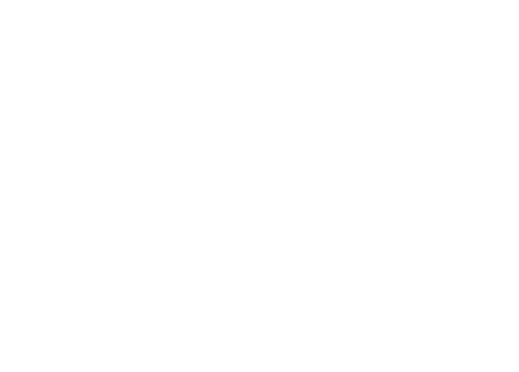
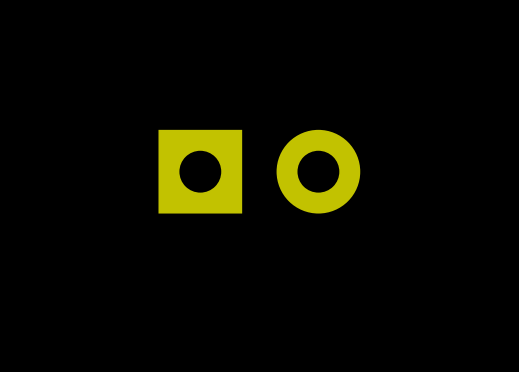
part: none -> (259, 171)

